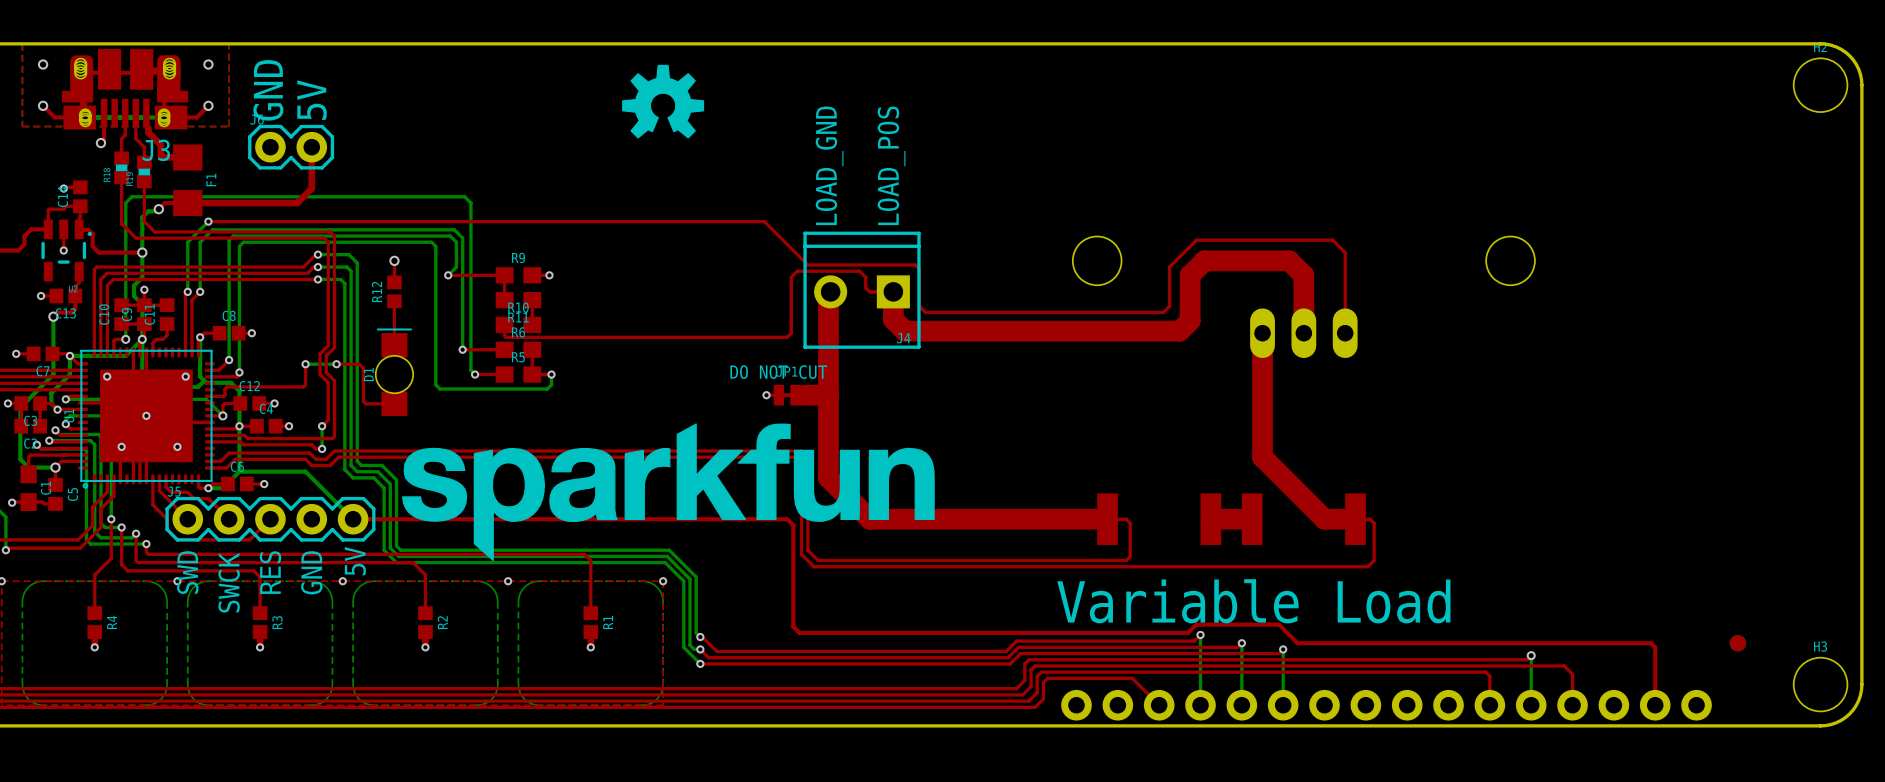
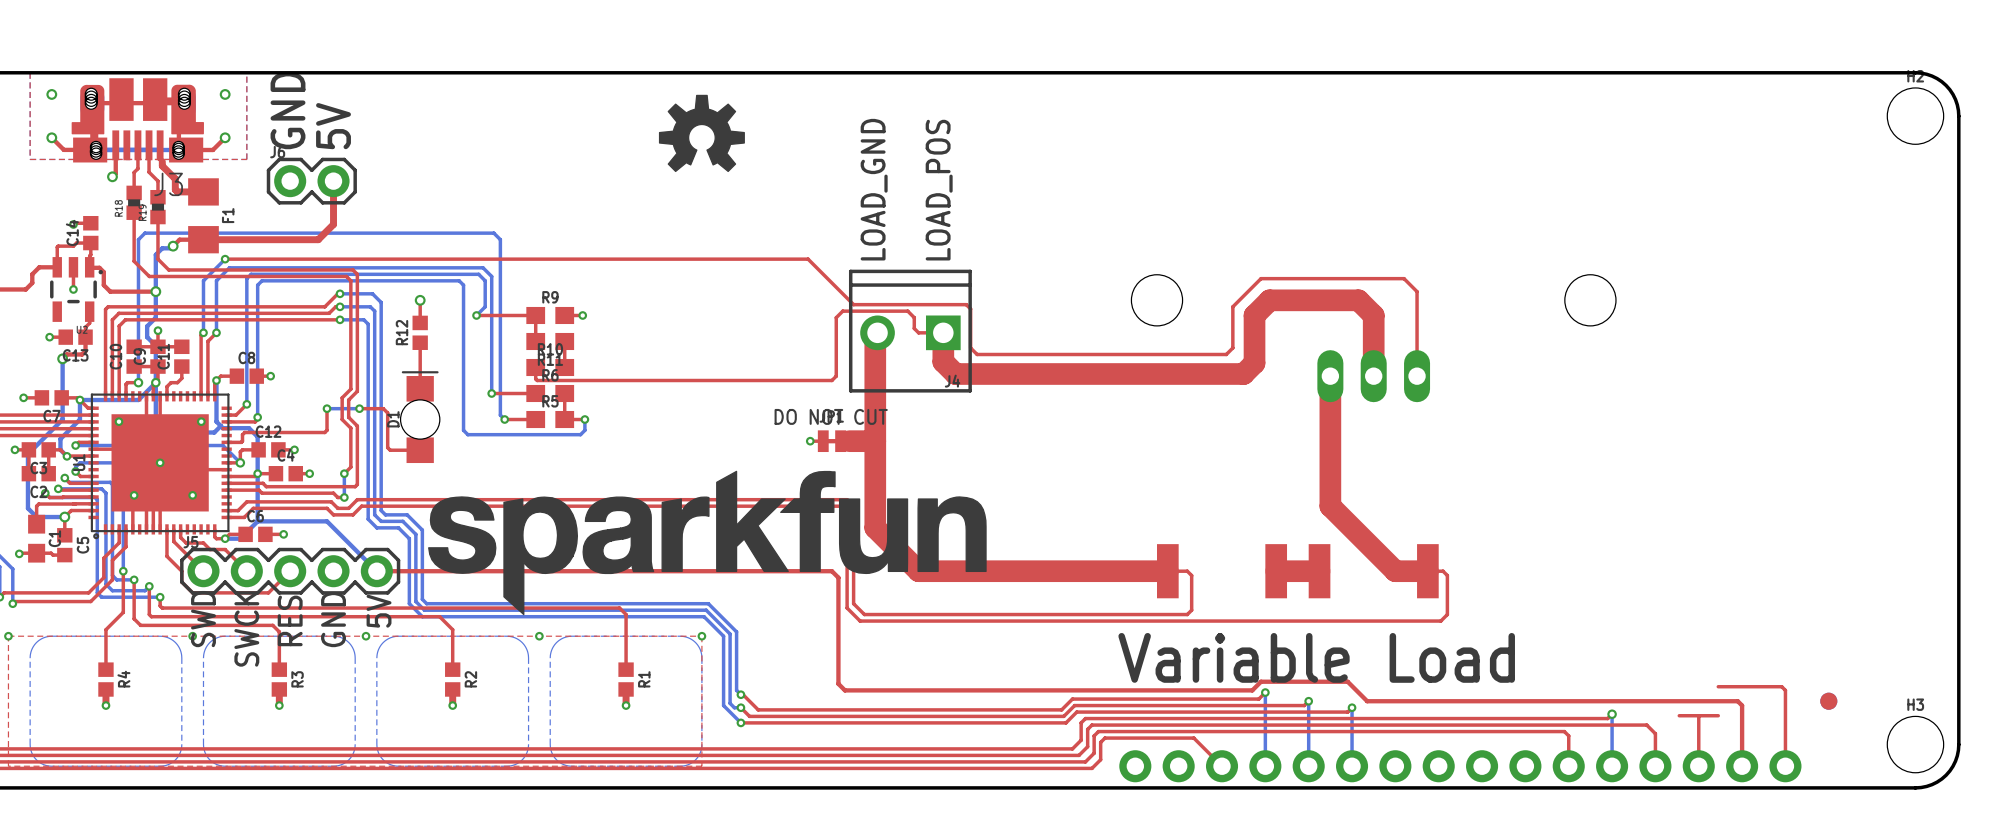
top track: none -> (1718, 686) (1781, 686) (1785, 690) (1785, 766)
top track: none -> (1679, 715) (1718, 715)
top track: none -> (1698, 715) (1698, 766)

